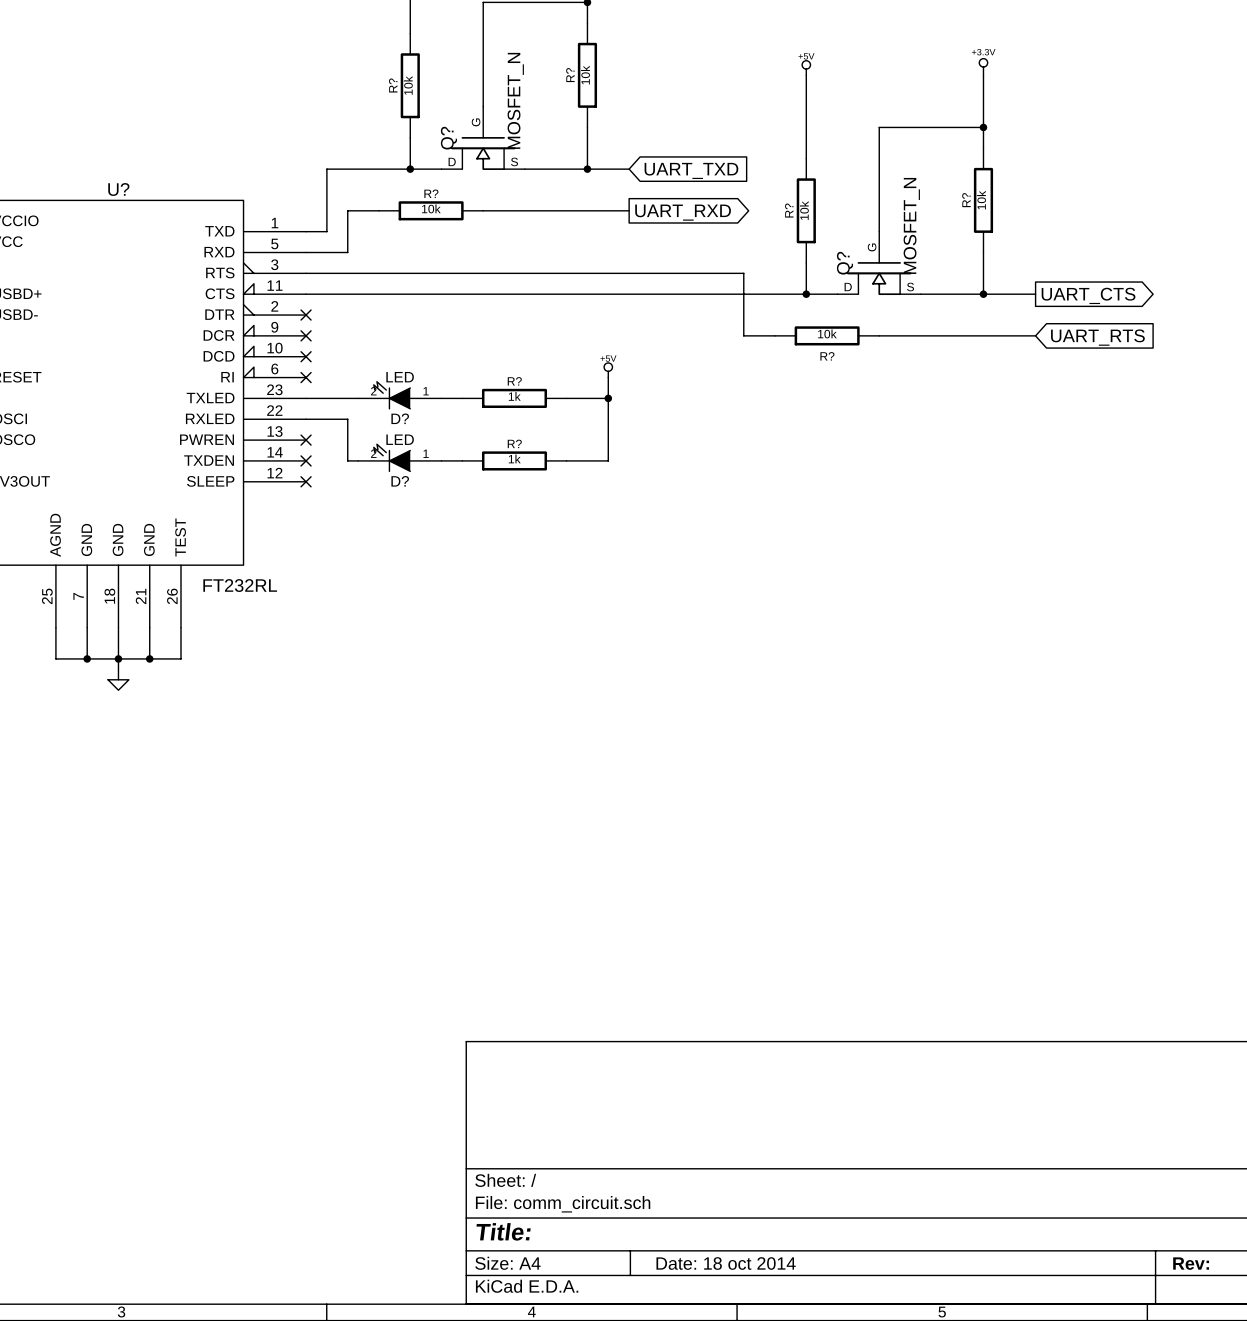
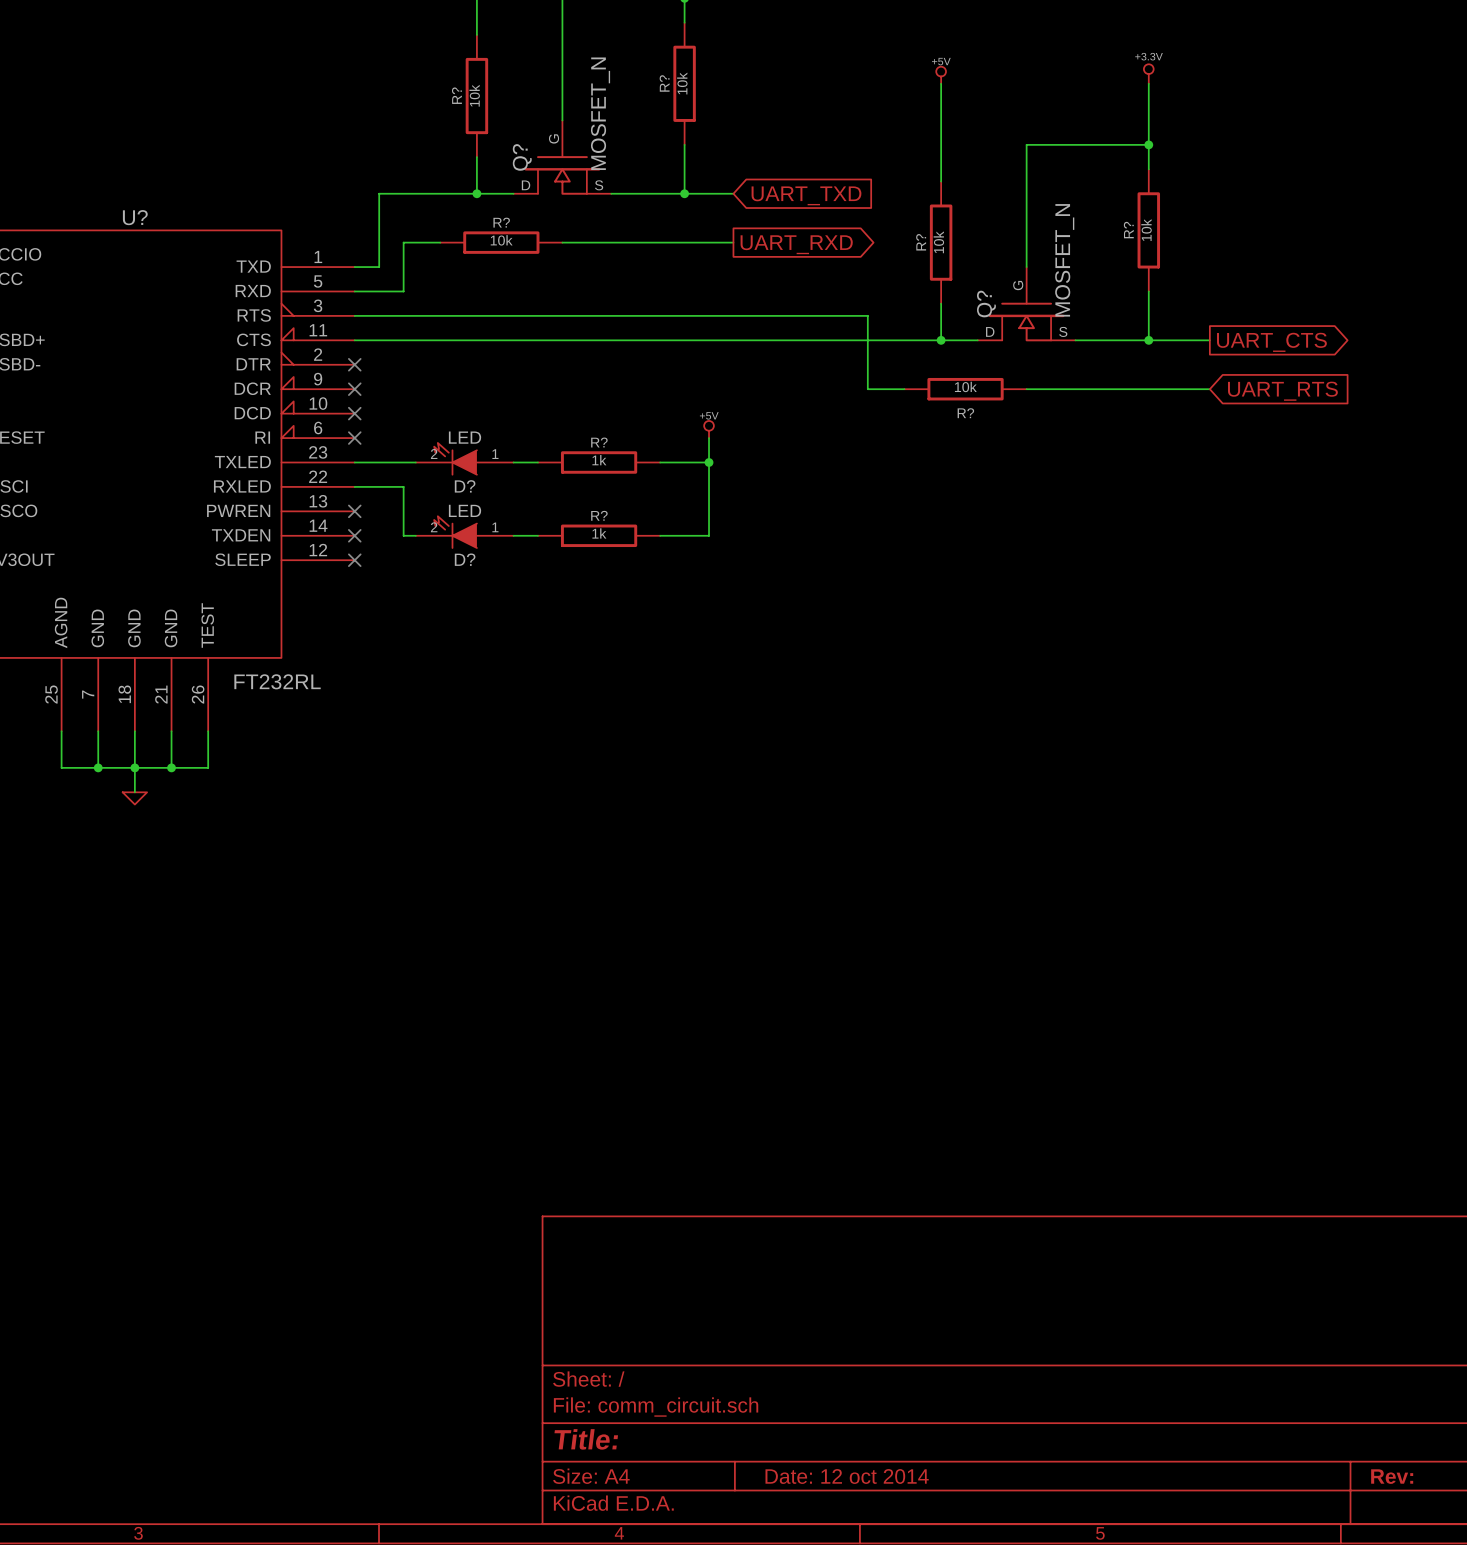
title block: Date: 18 oct 2014 (726, 1263) -> Date: 12 oct 2014 (847, 1476)

